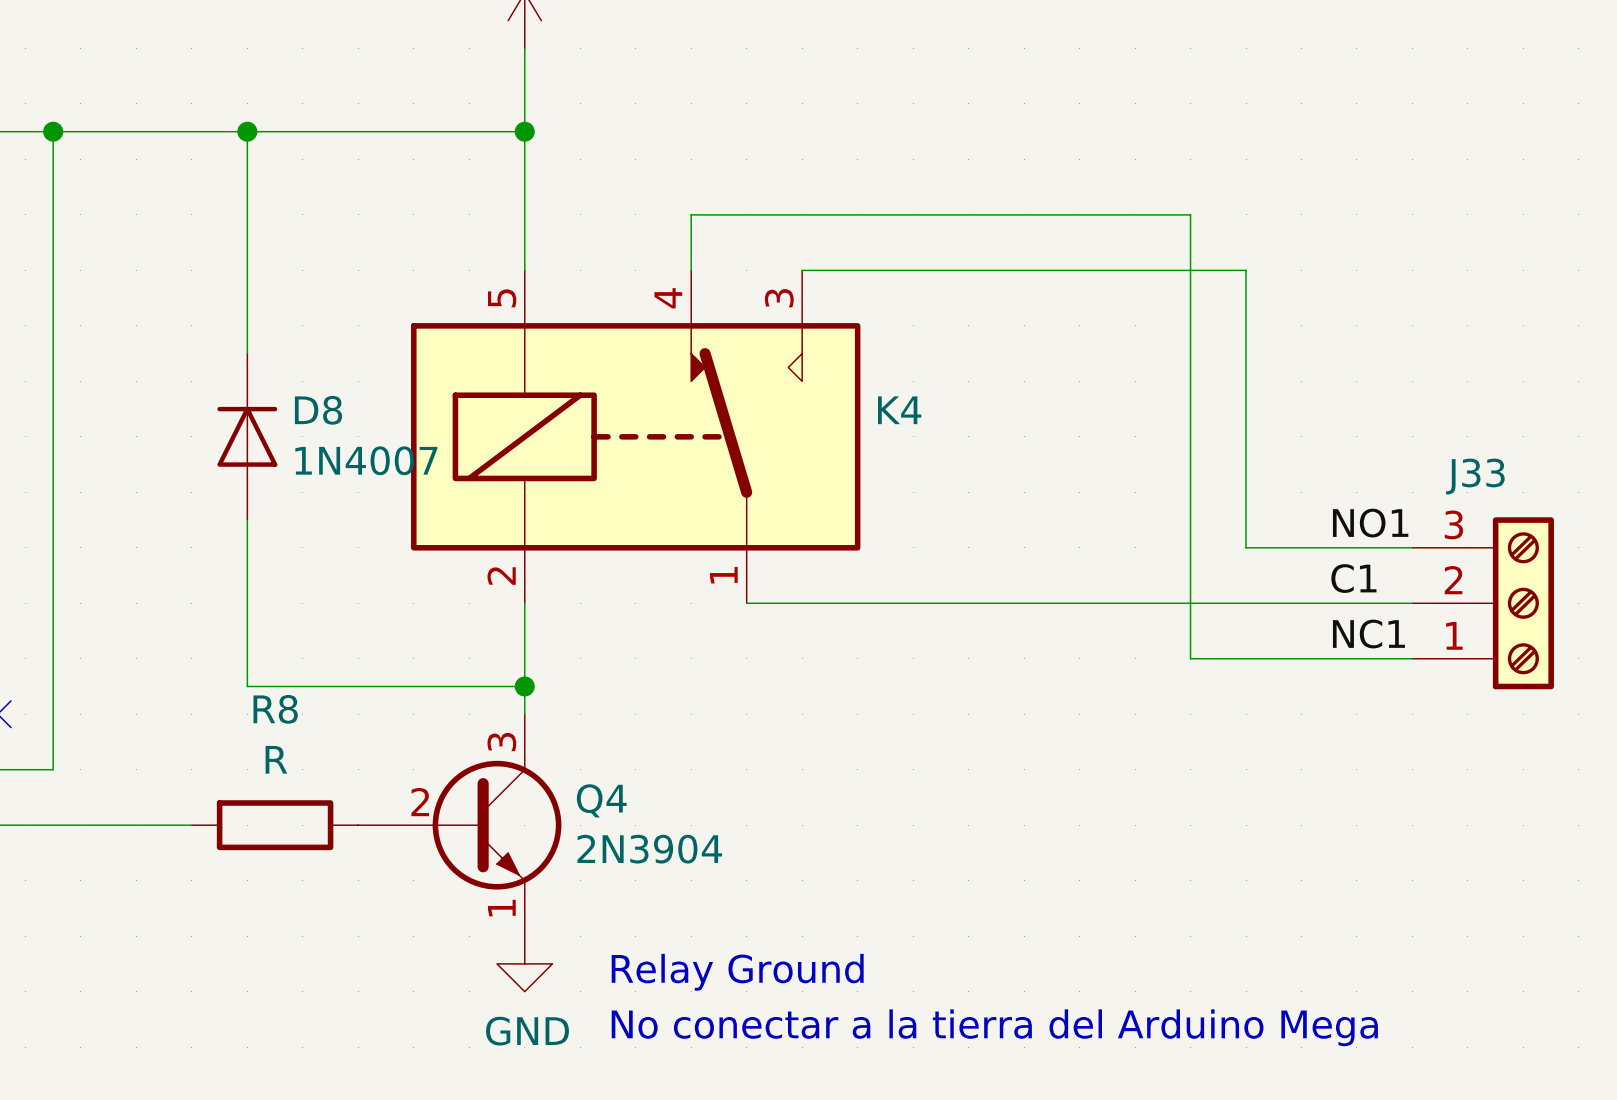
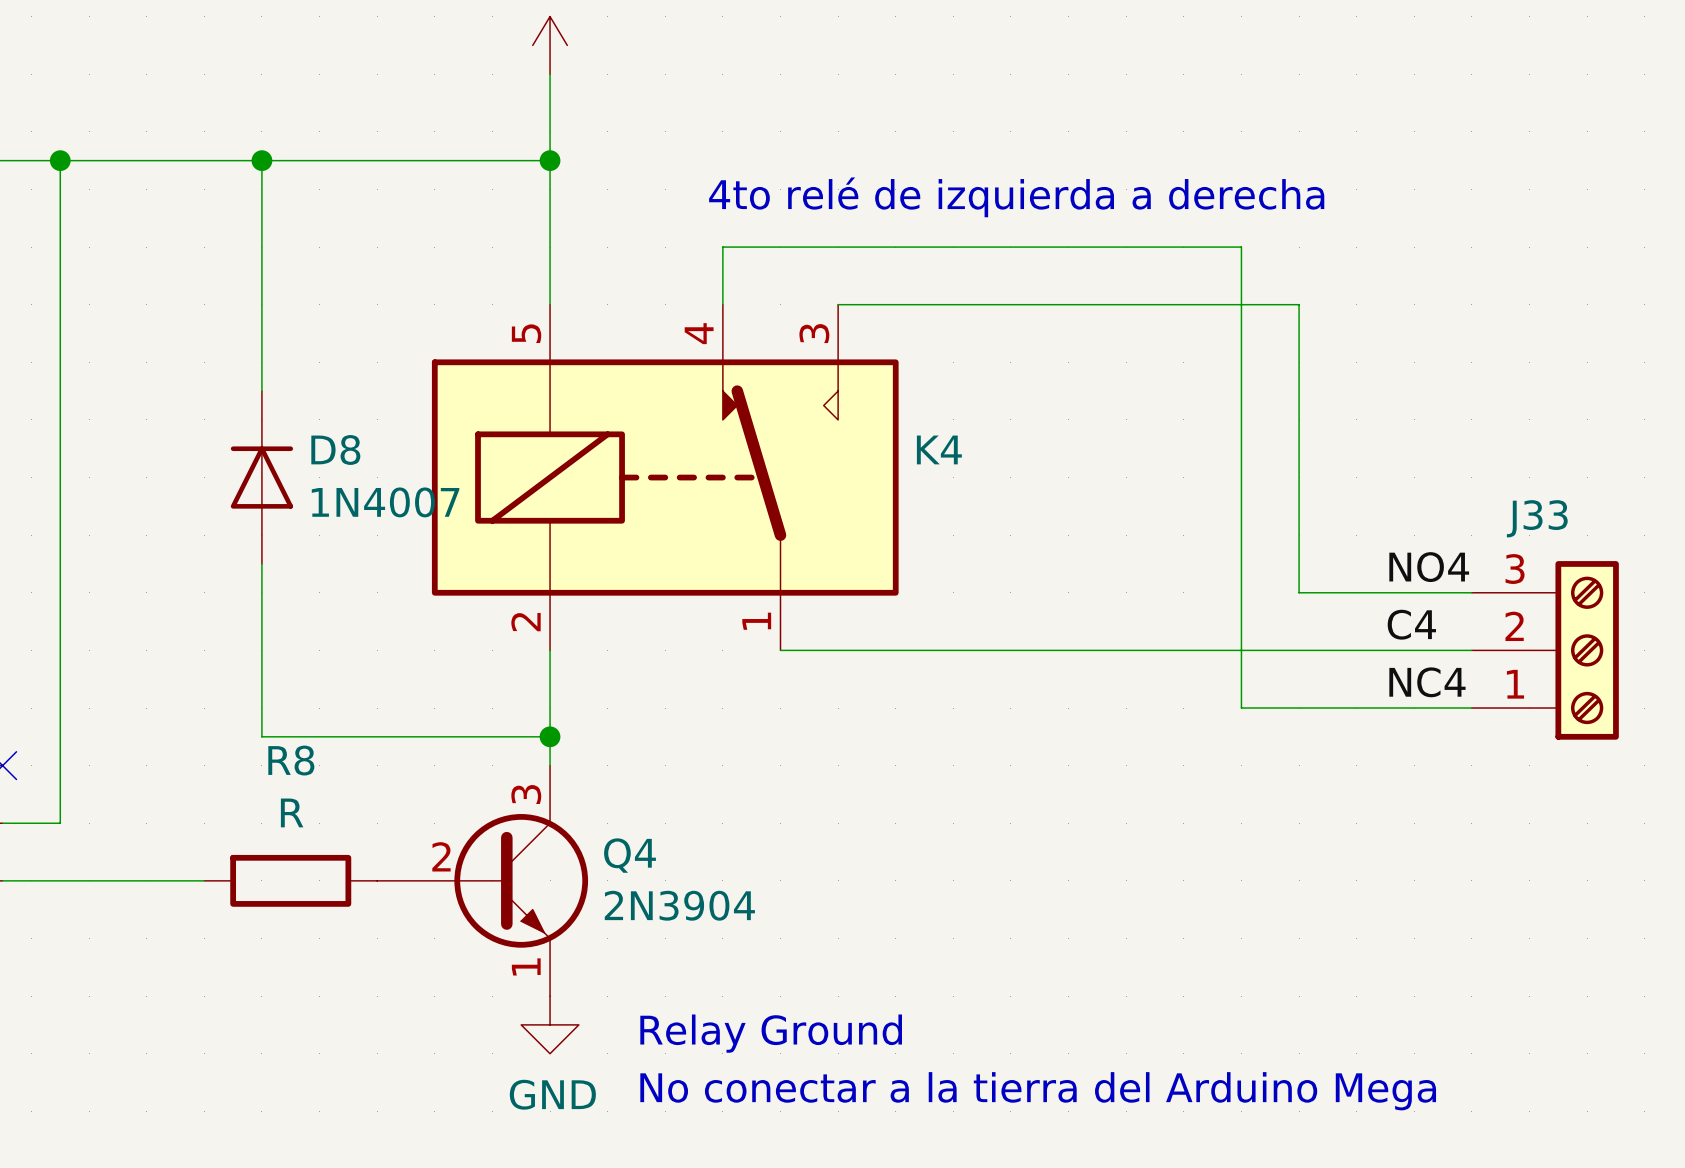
text: none -> 4to relé de izquierda a derecha (1016, 197)
label: NO1 (1370, 523) -> NO4 (1429, 567)
label: C1 (1353, 578) -> C4 (1411, 624)
label: NC1 (1368, 634) -> NC4 (1427, 682)

